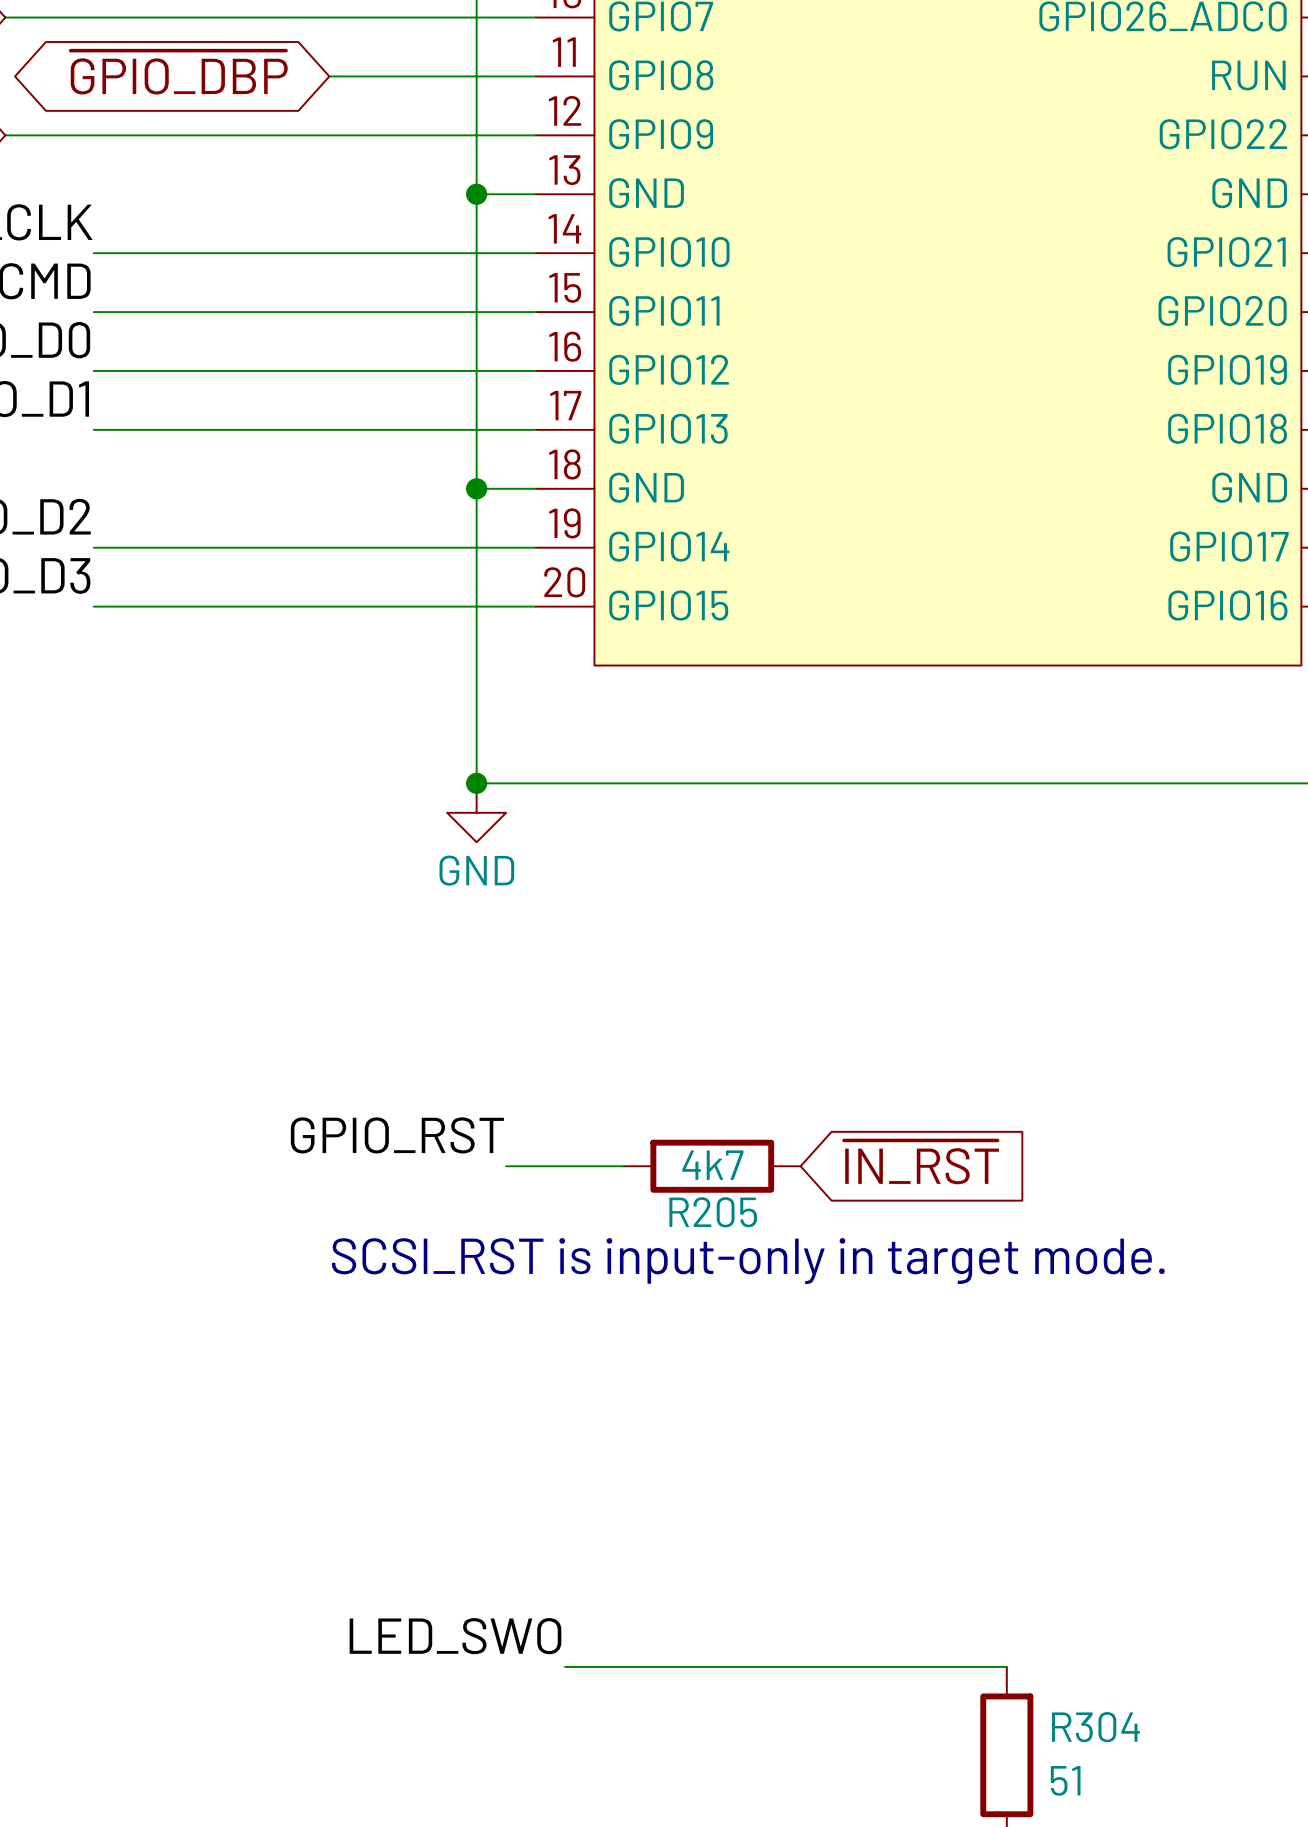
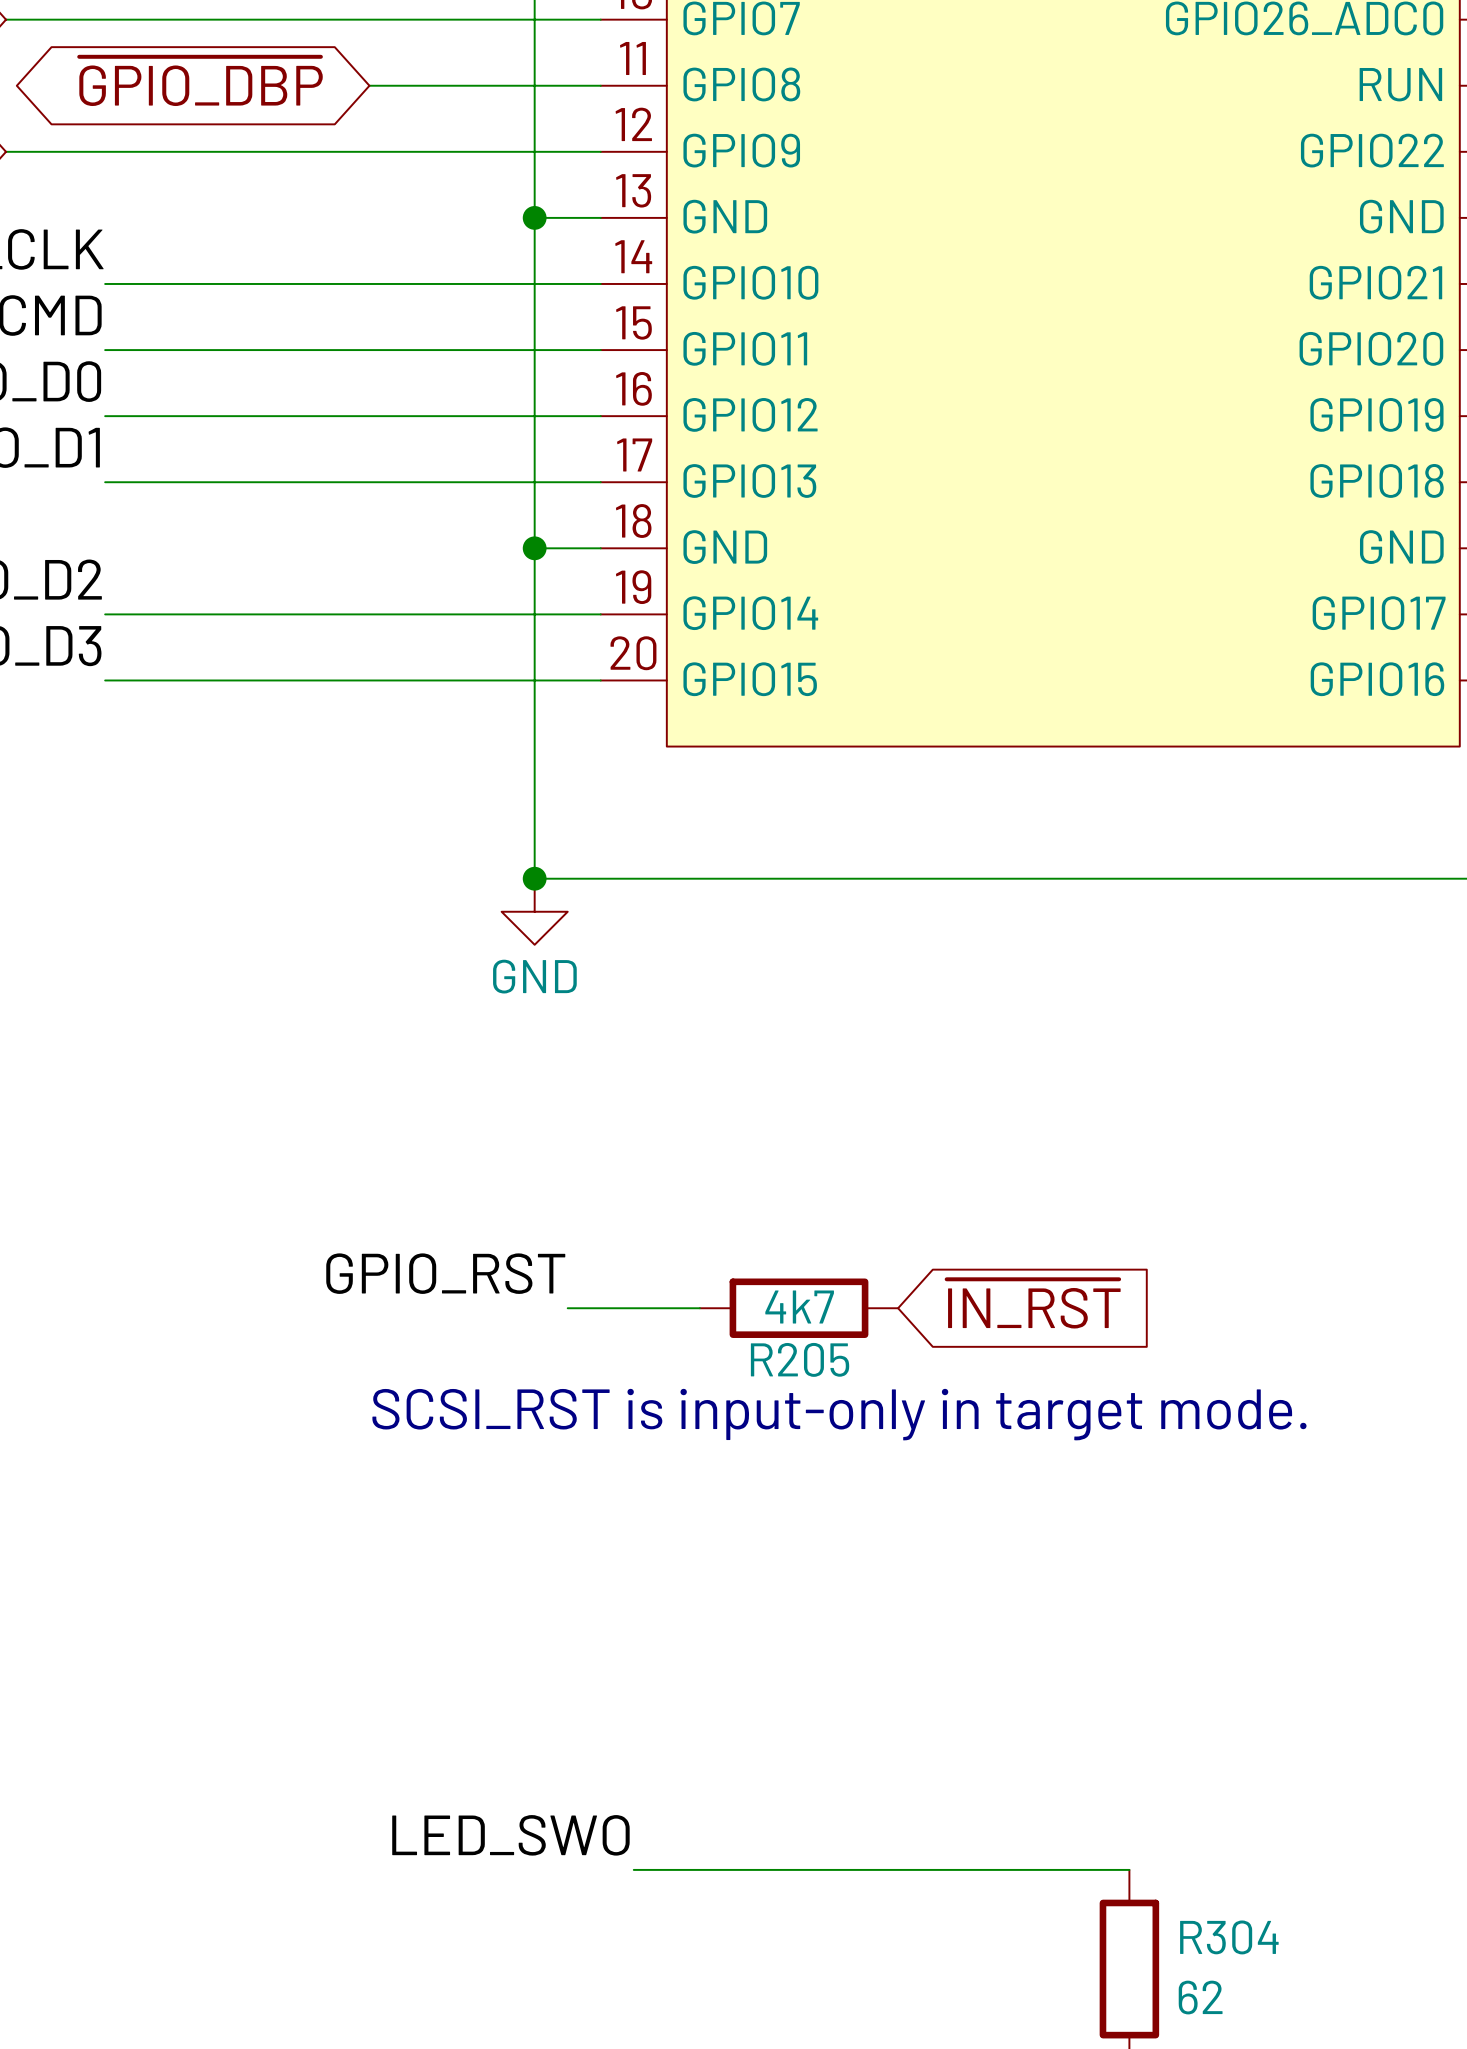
R304 value: 51 (1065, 1780) -> 62 (1200, 1997)

